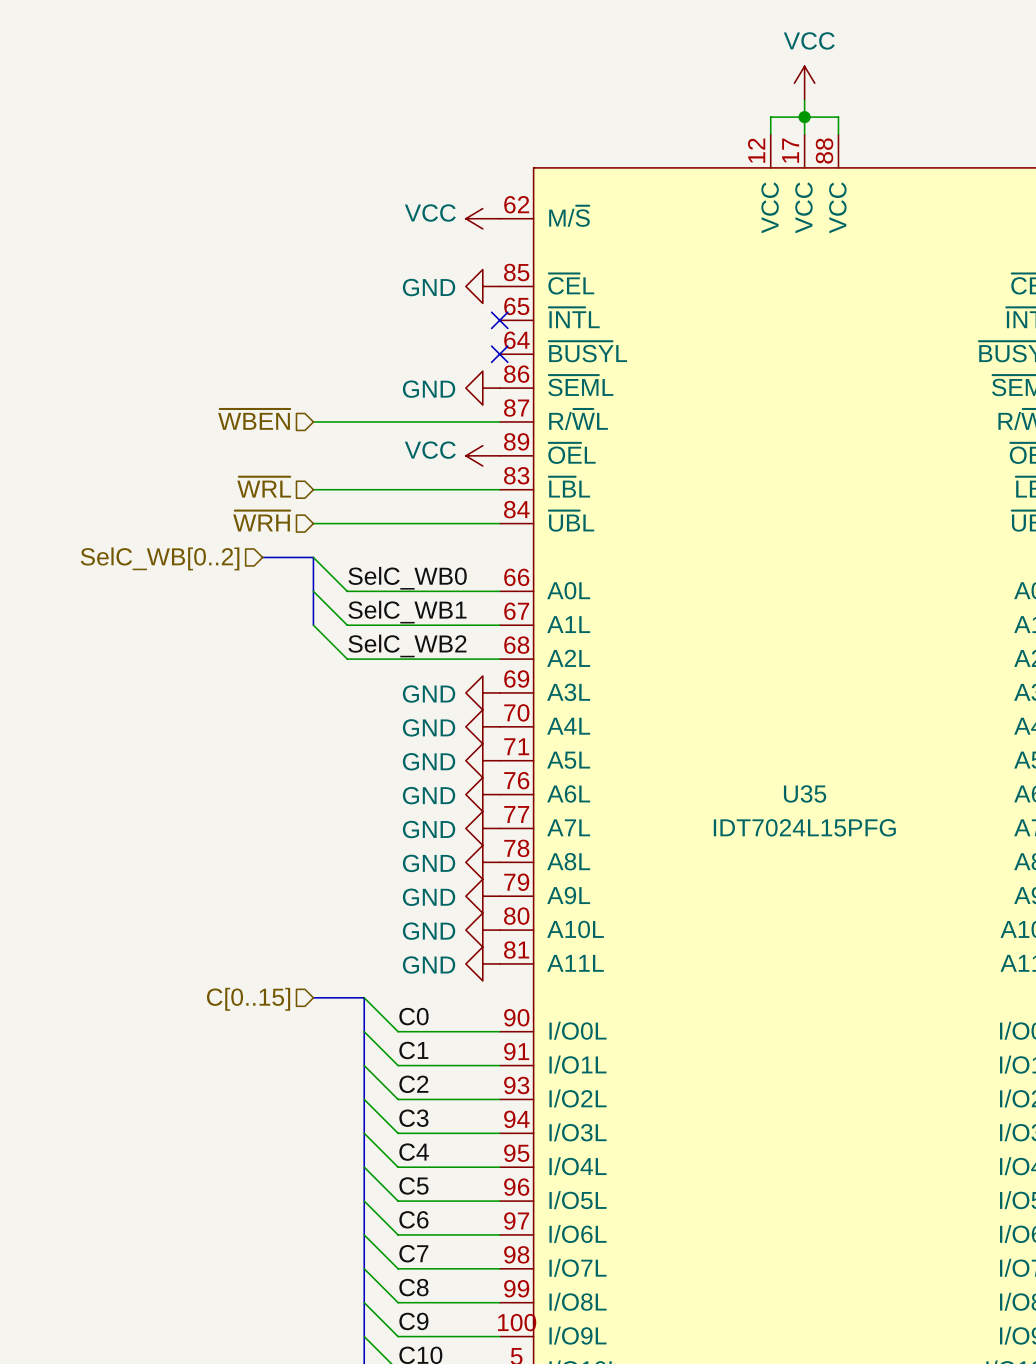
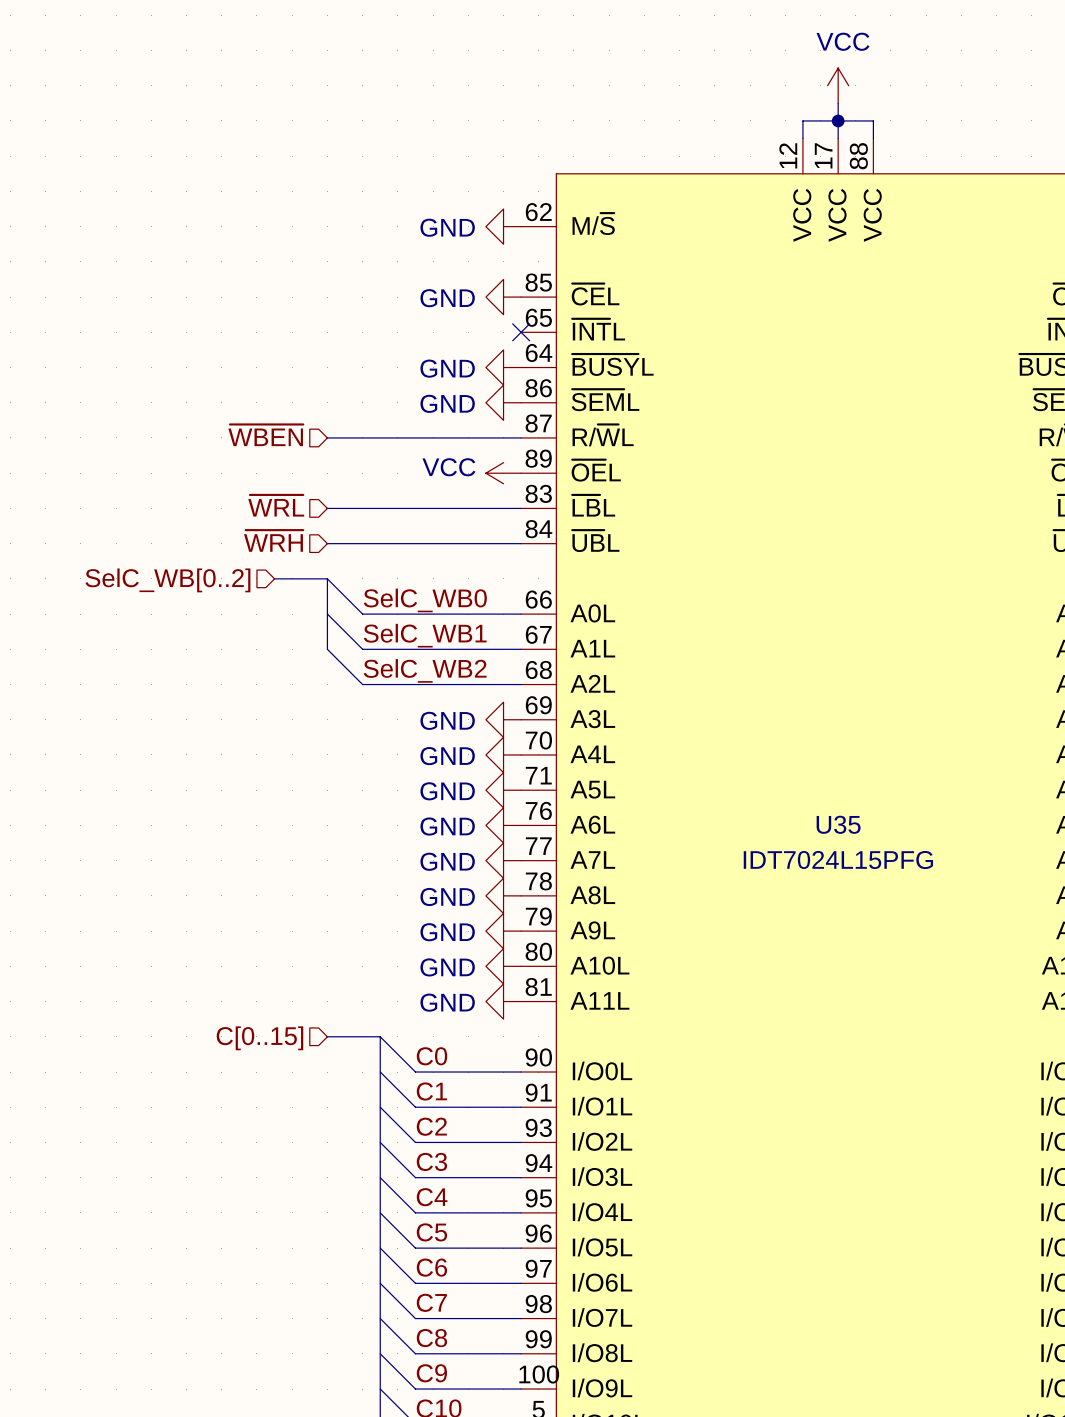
power symbol: VCC (482, 218) -> GND (503, 226)
power symbol: none -> GND (503, 367)
no-connect mark: (499, 354) -> none

